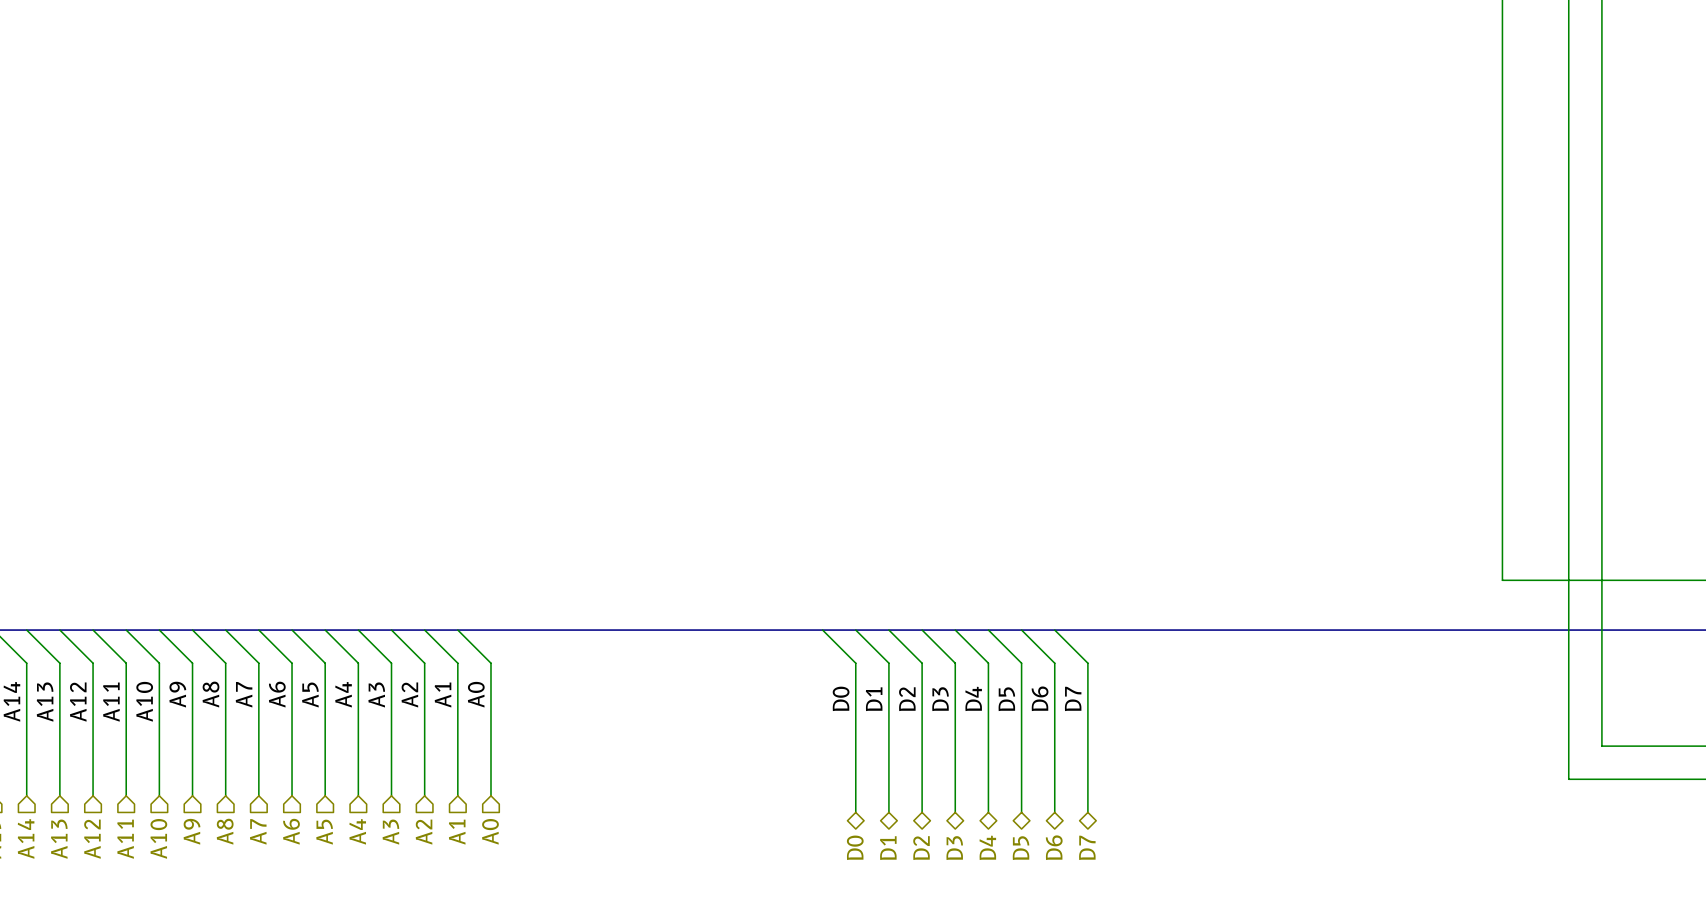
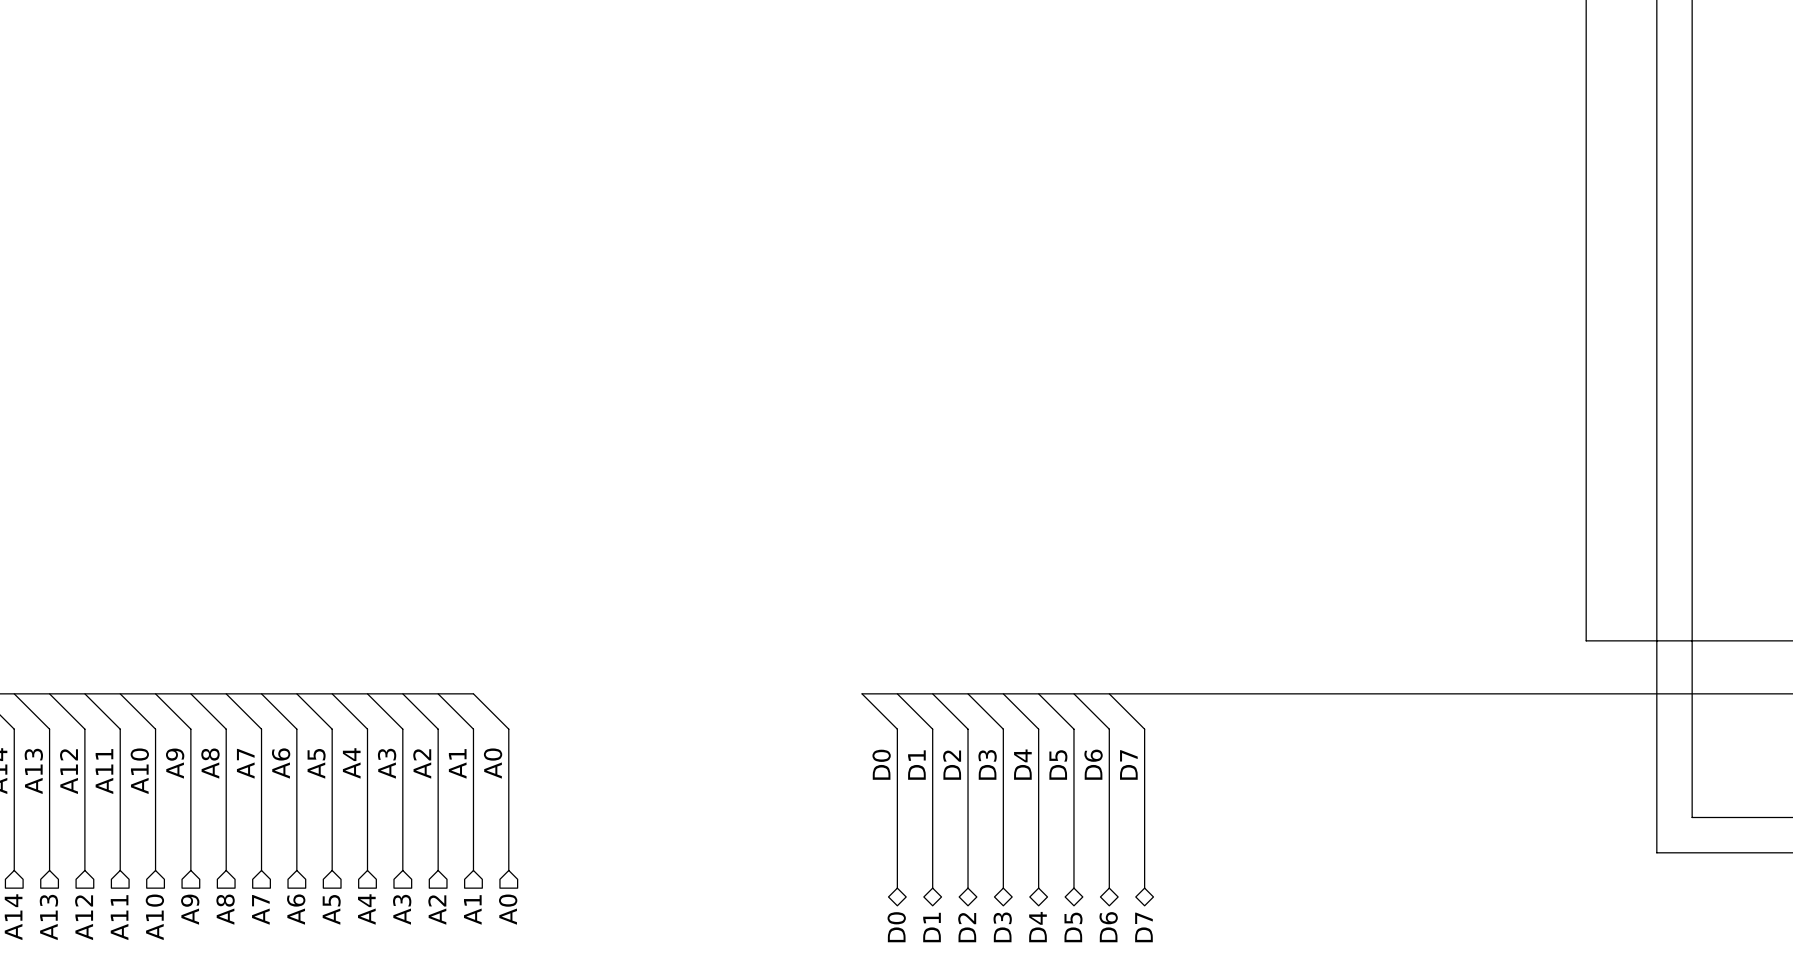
bus: (457, 630) (822, 630) -> none

